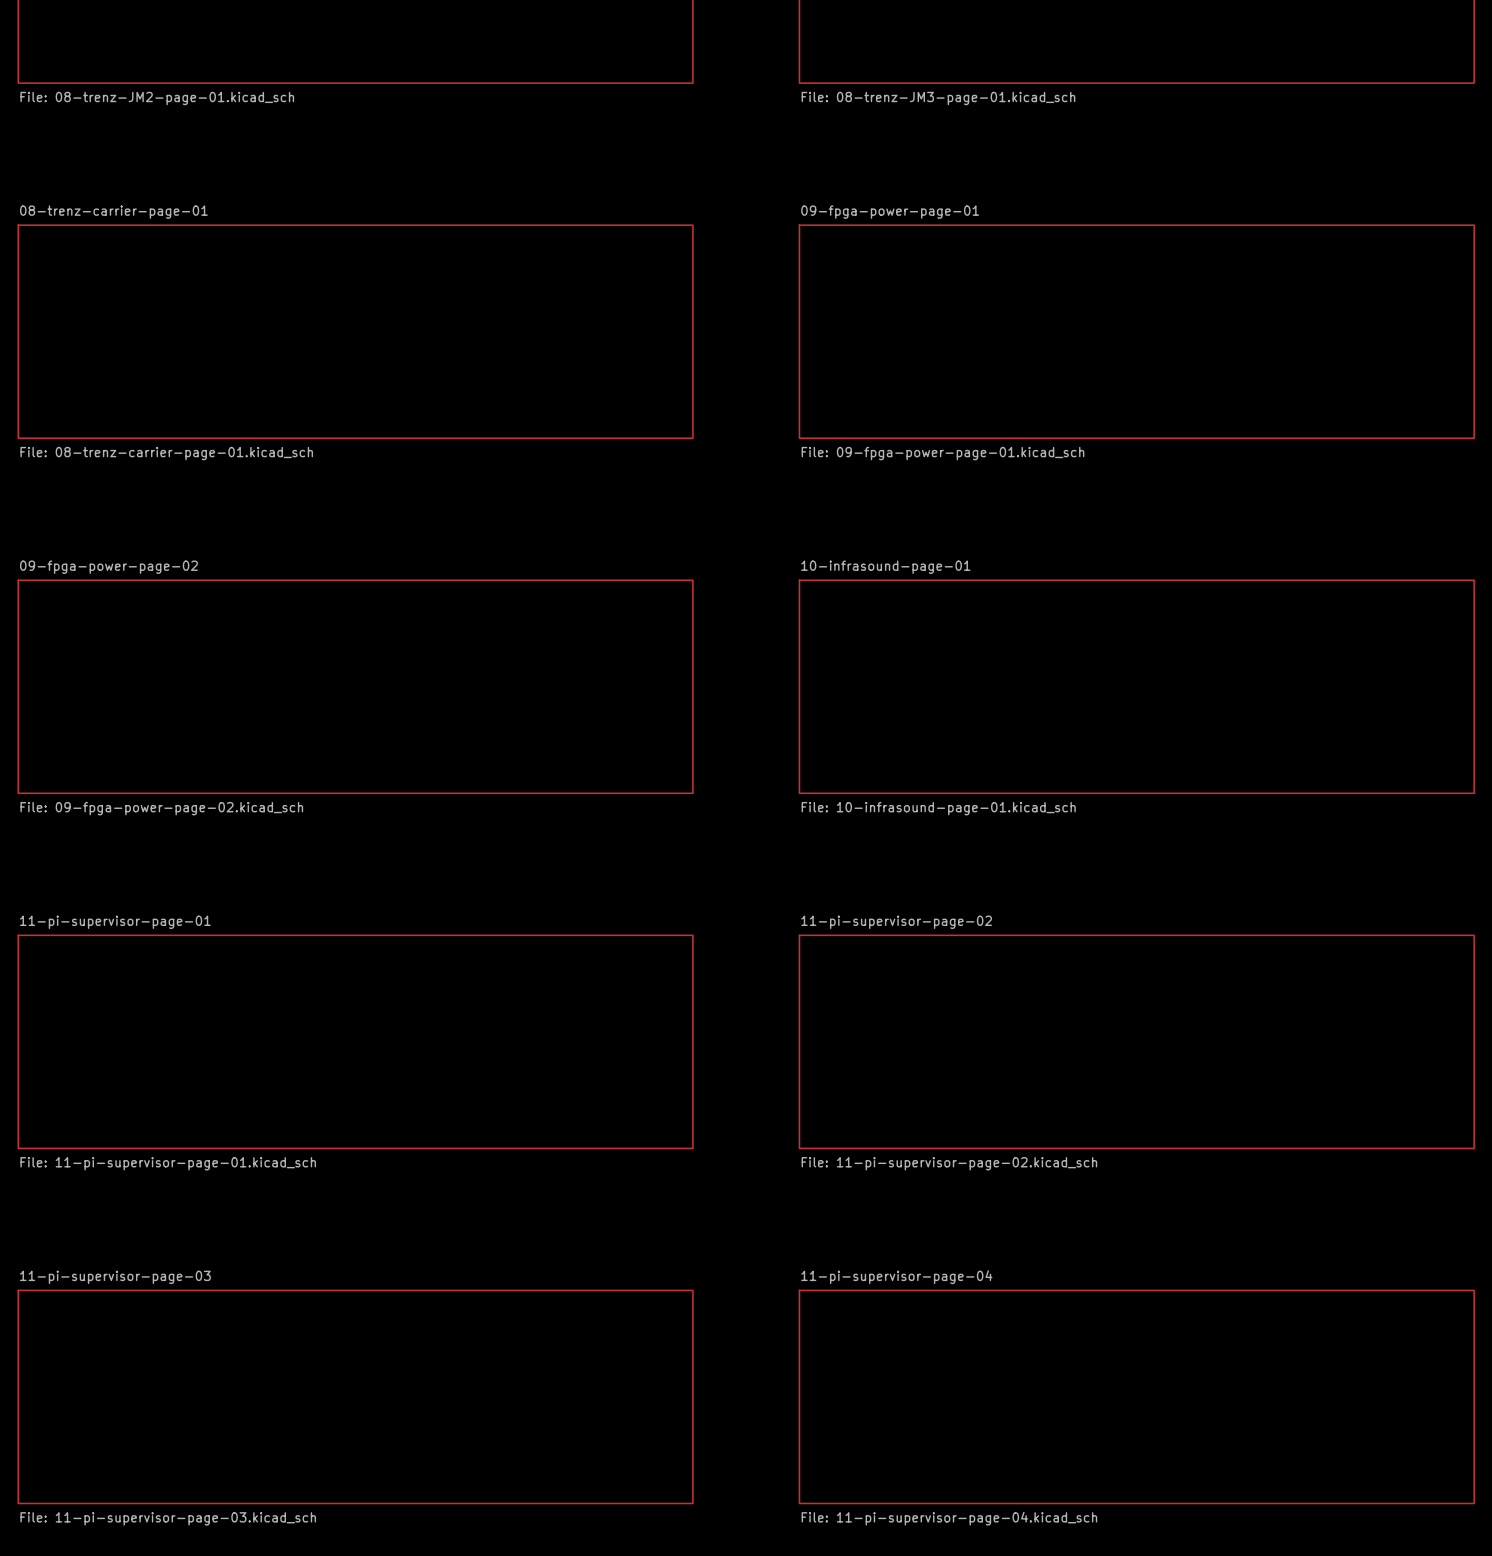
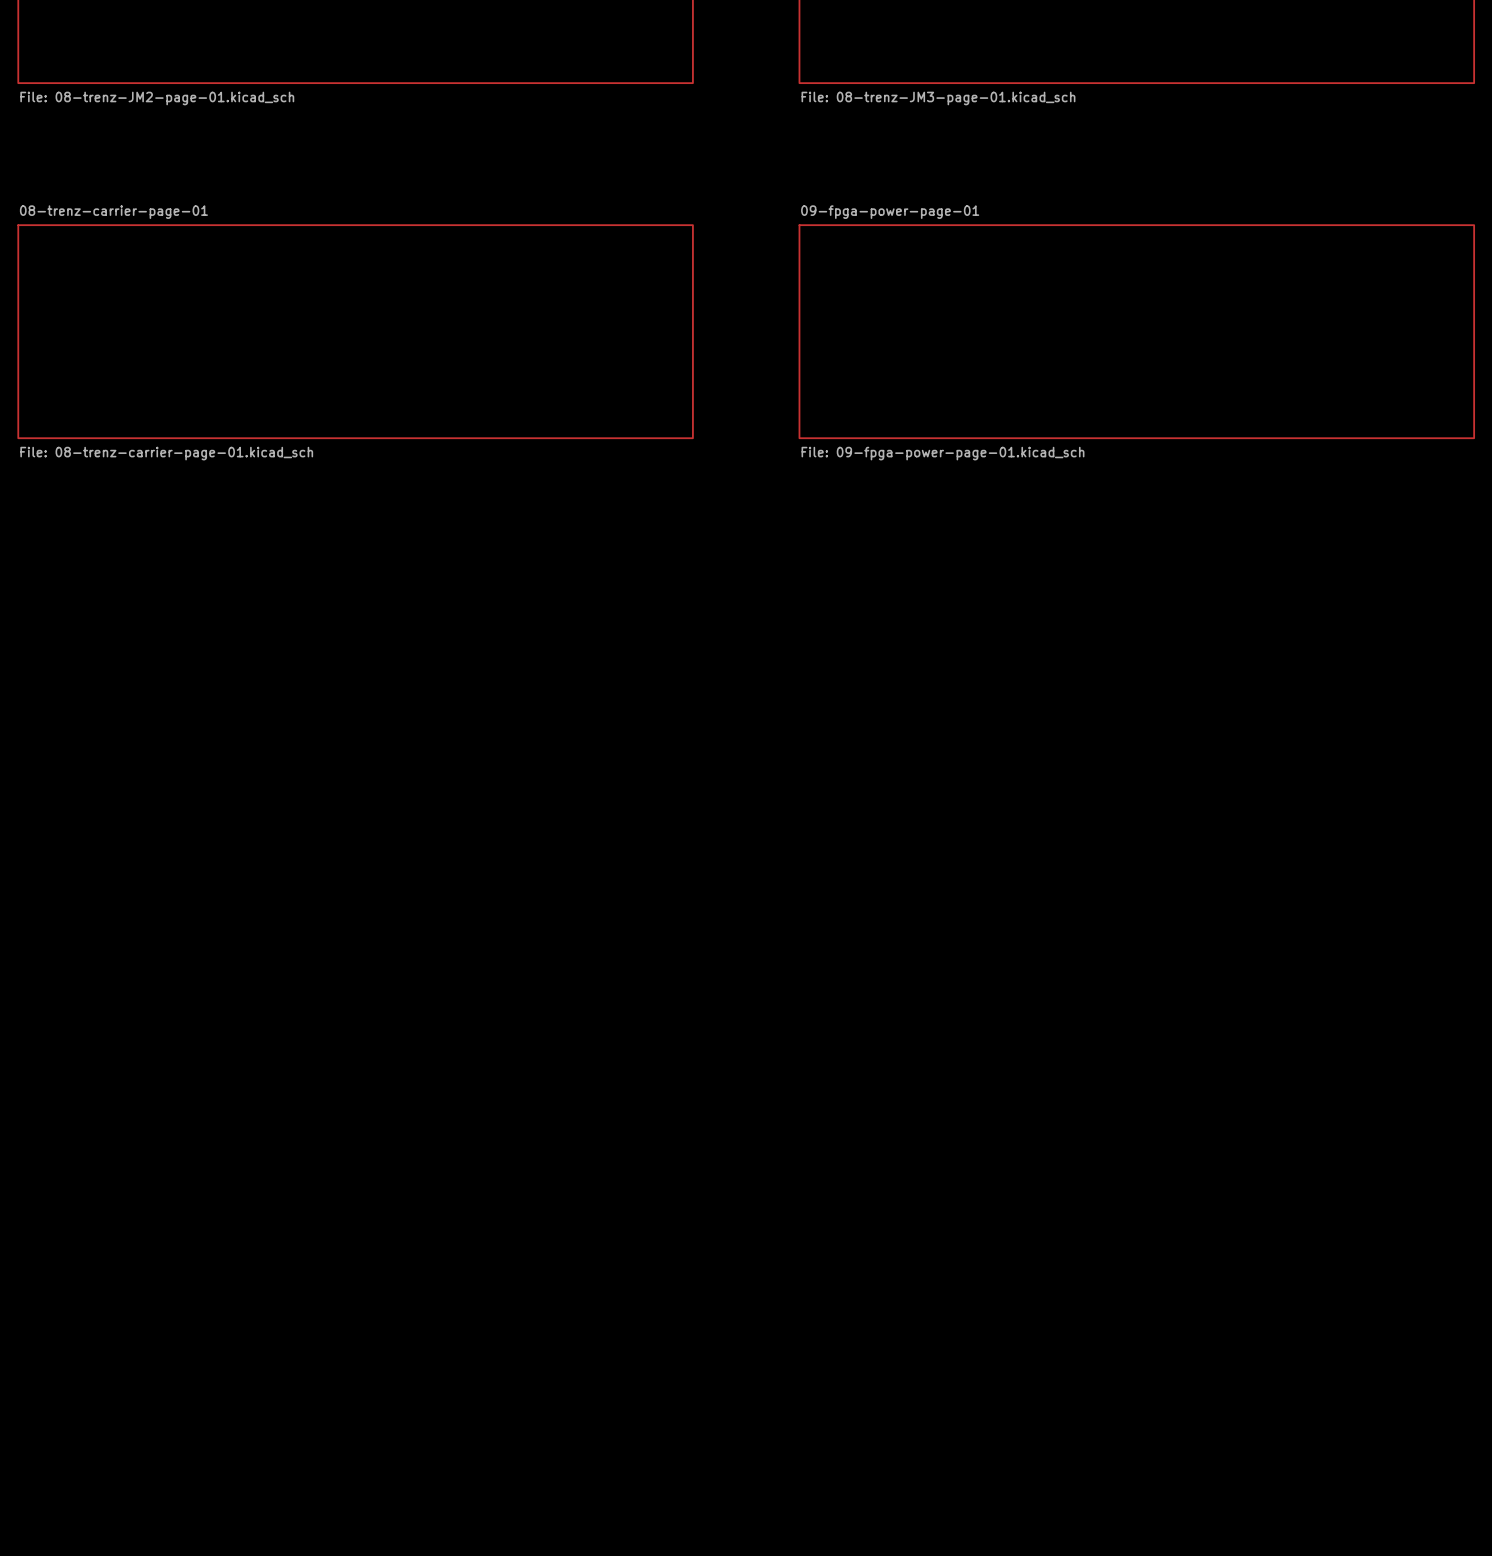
sheet 09-fpga-power-page-02: File: 09-fpga-power-page-02.kicad_sch (355, 686) -> none
sheet 10-infrasound-page-01: File: 10-infrasound-page-01.kicad_sch (1136, 686) -> none
sheet 11-pi-supervisor-page-01: File: 11-pi-supervisor-page-01.kicad_sch (355, 1041) -> none
sheet 11-pi-supervisor-page-02: File: 11-pi-supervisor-page-02.kicad_sch (1136, 1041) -> none
sheet 11-pi-supervisor-page-03: File: 11-pi-supervisor-page-03.kicad_sch (355, 1396) -> none
sheet 11-pi-supervisor-page-04: File: 11-pi-supervisor-page-04.kicad_sch (1136, 1396) -> none

